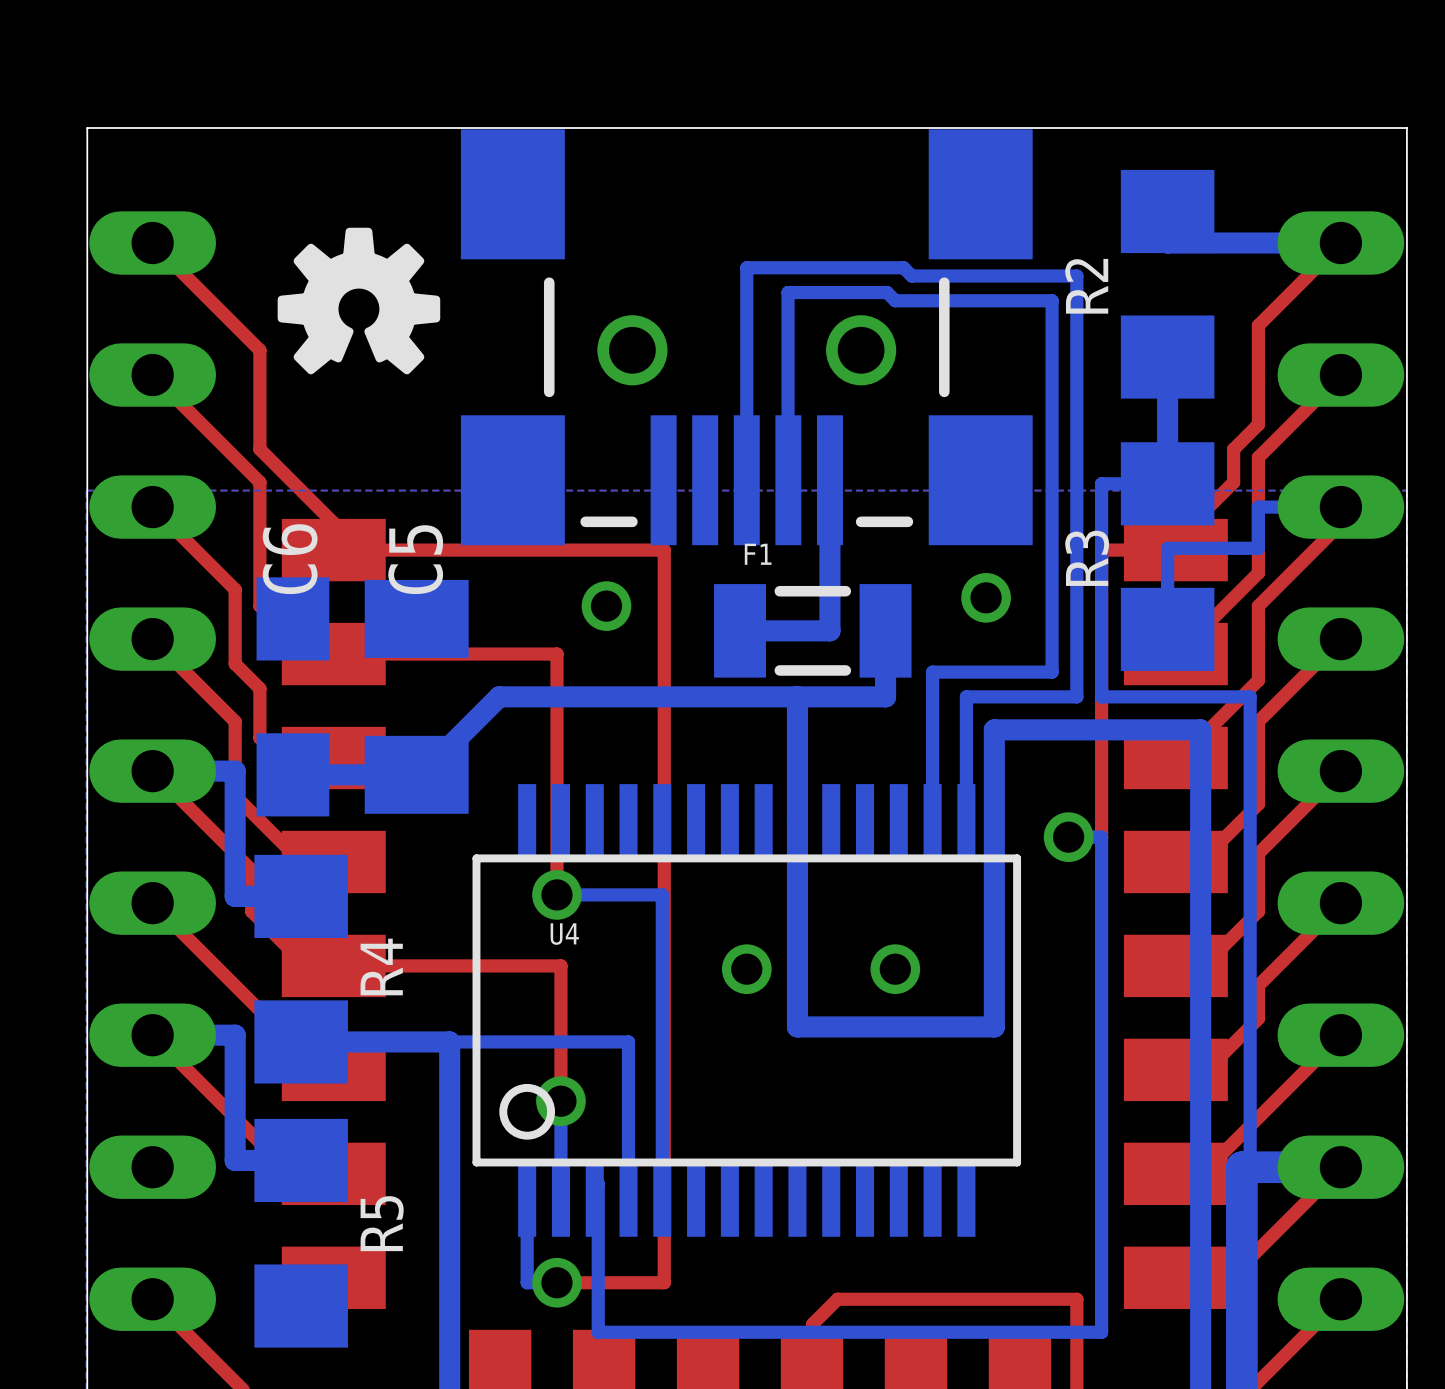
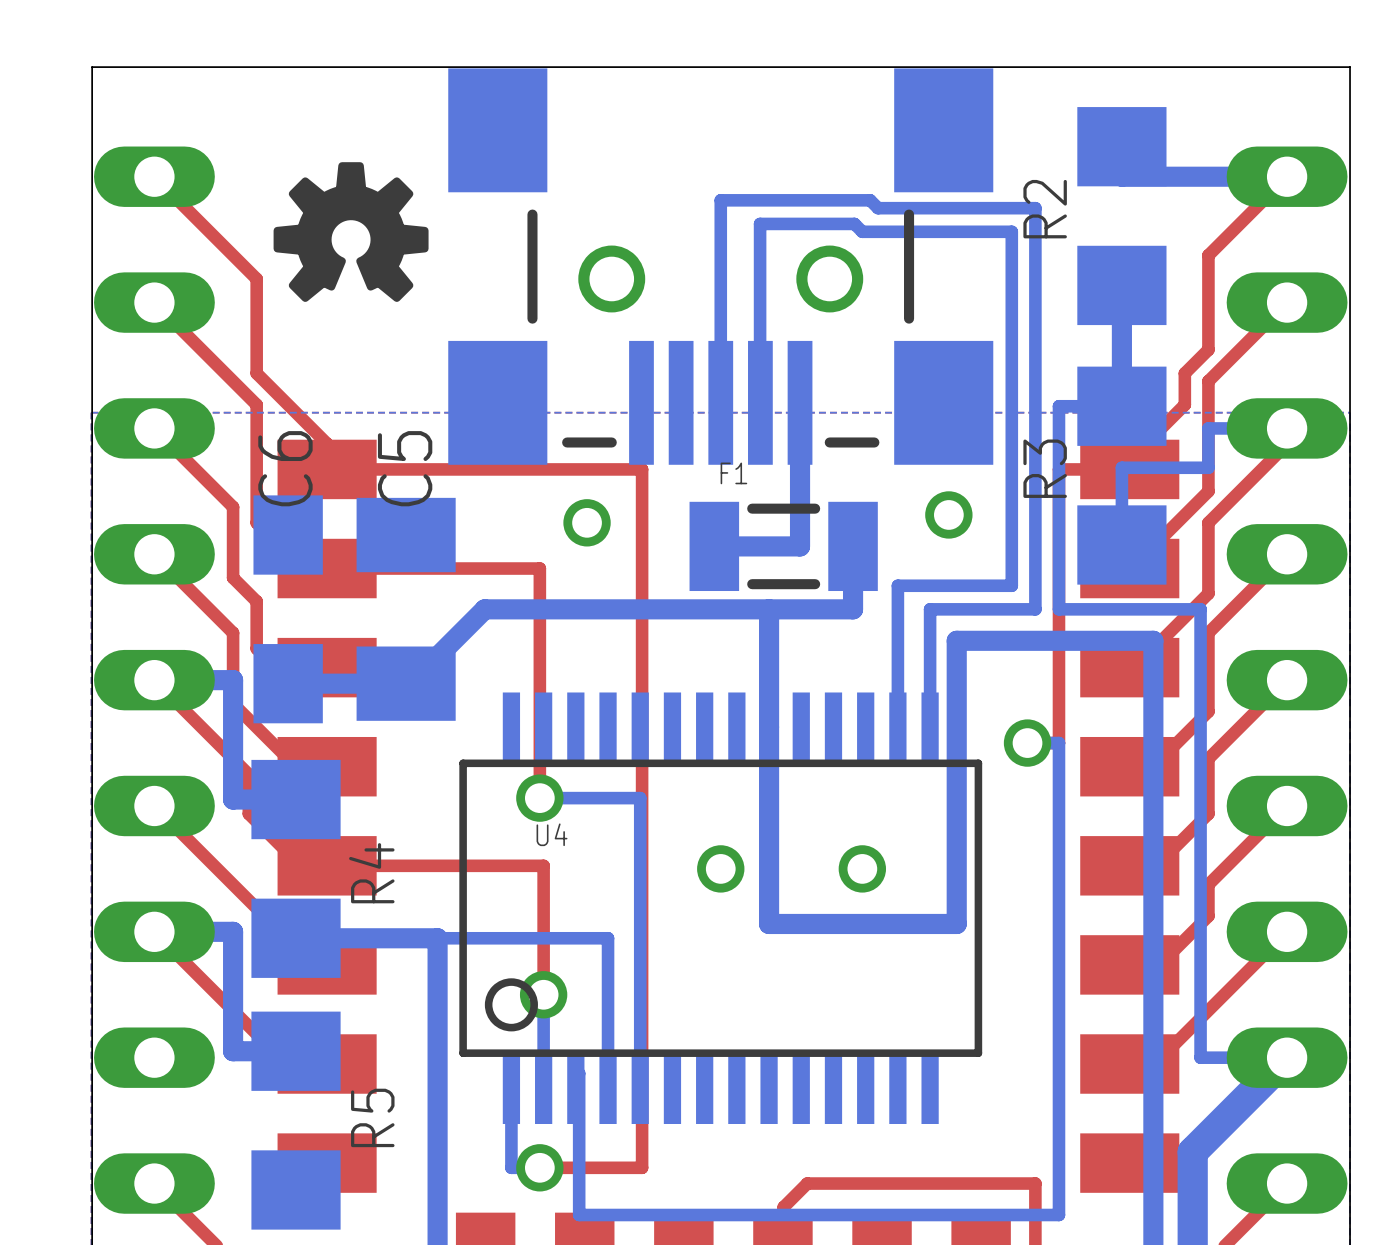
bottom track: (1340, 1167) (1241, 1167) (1241, 1266) -> (1287, 1057) (1192, 1152)

